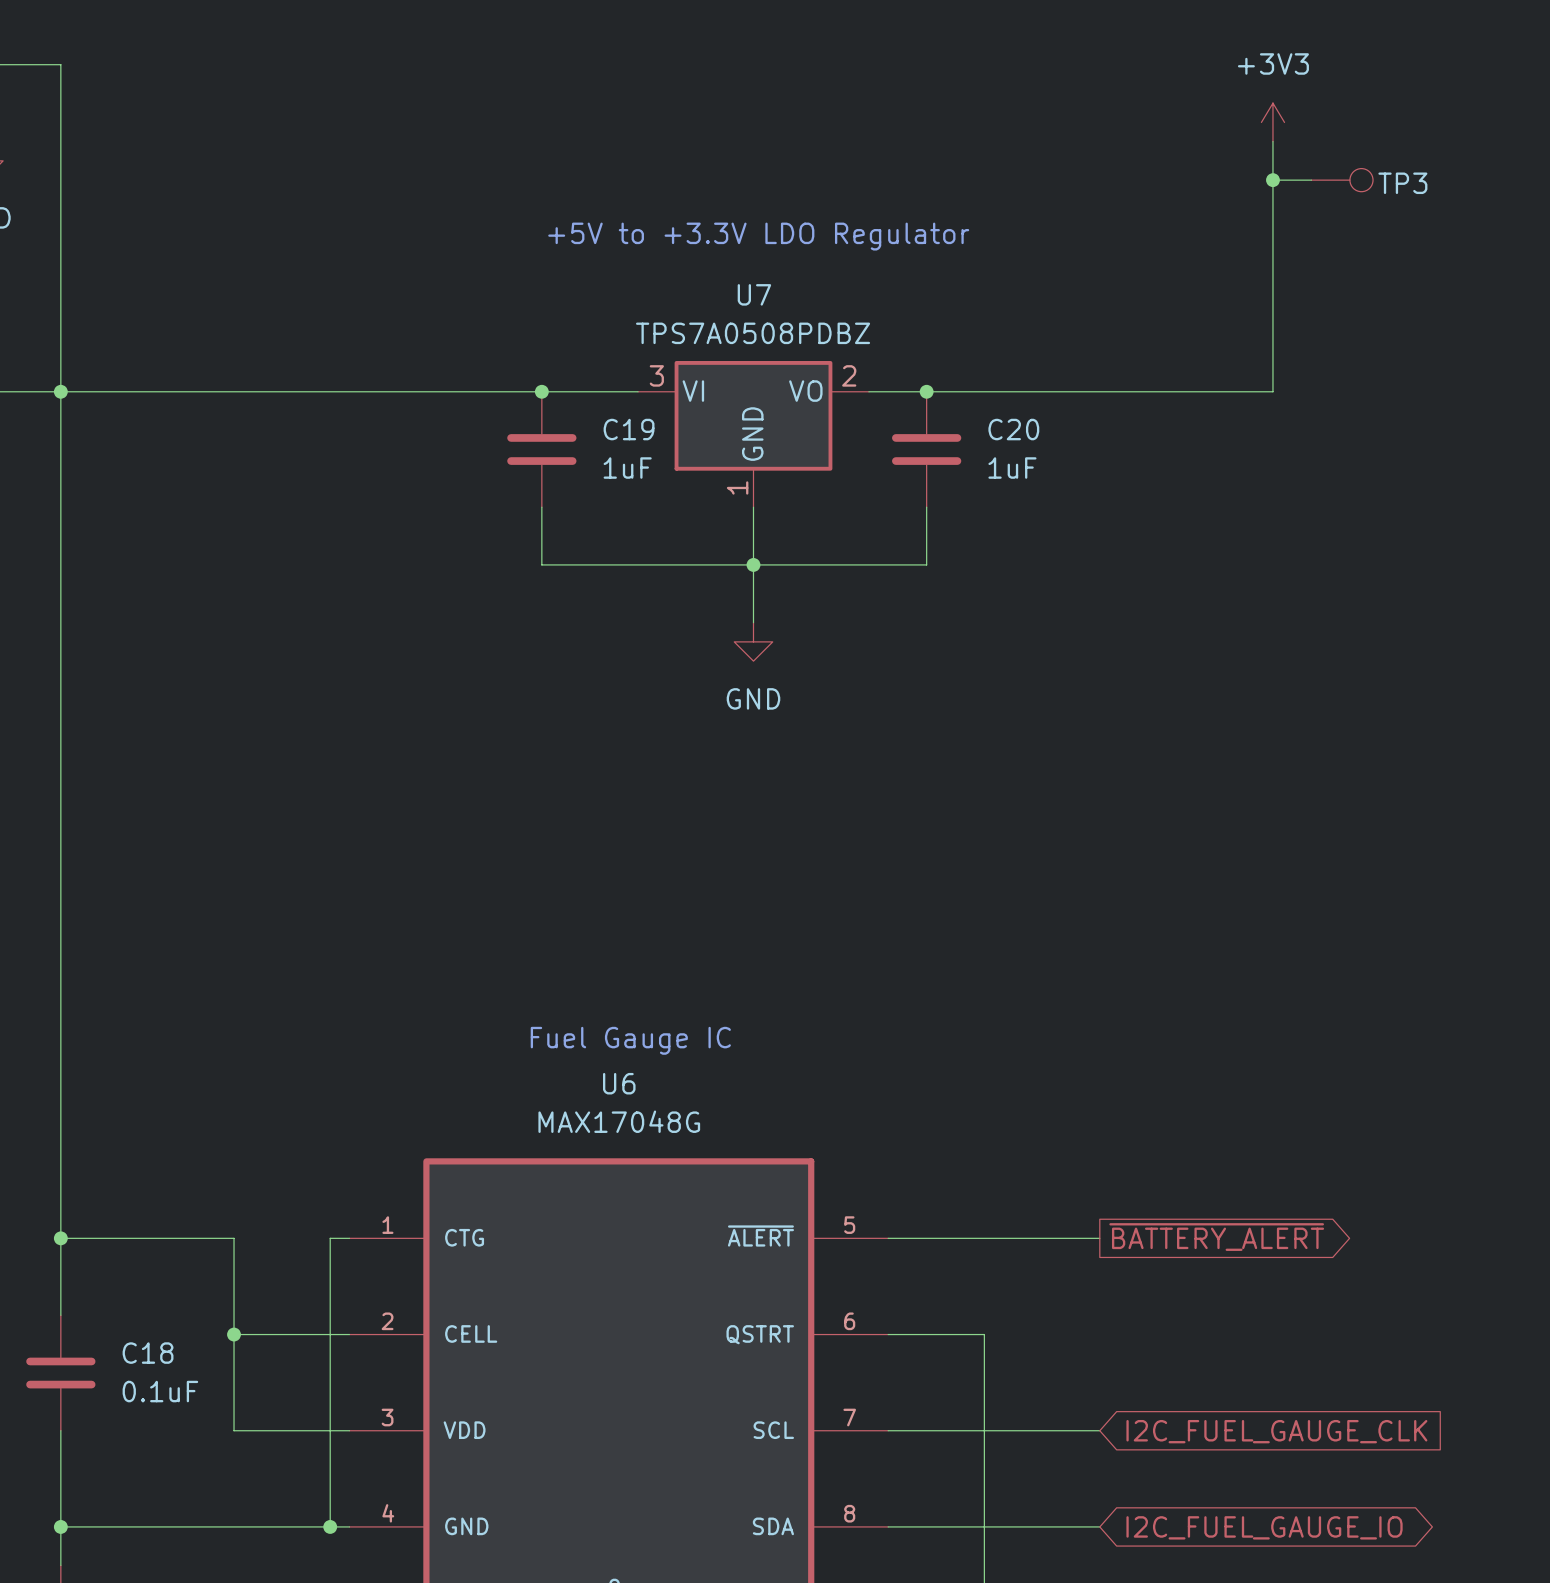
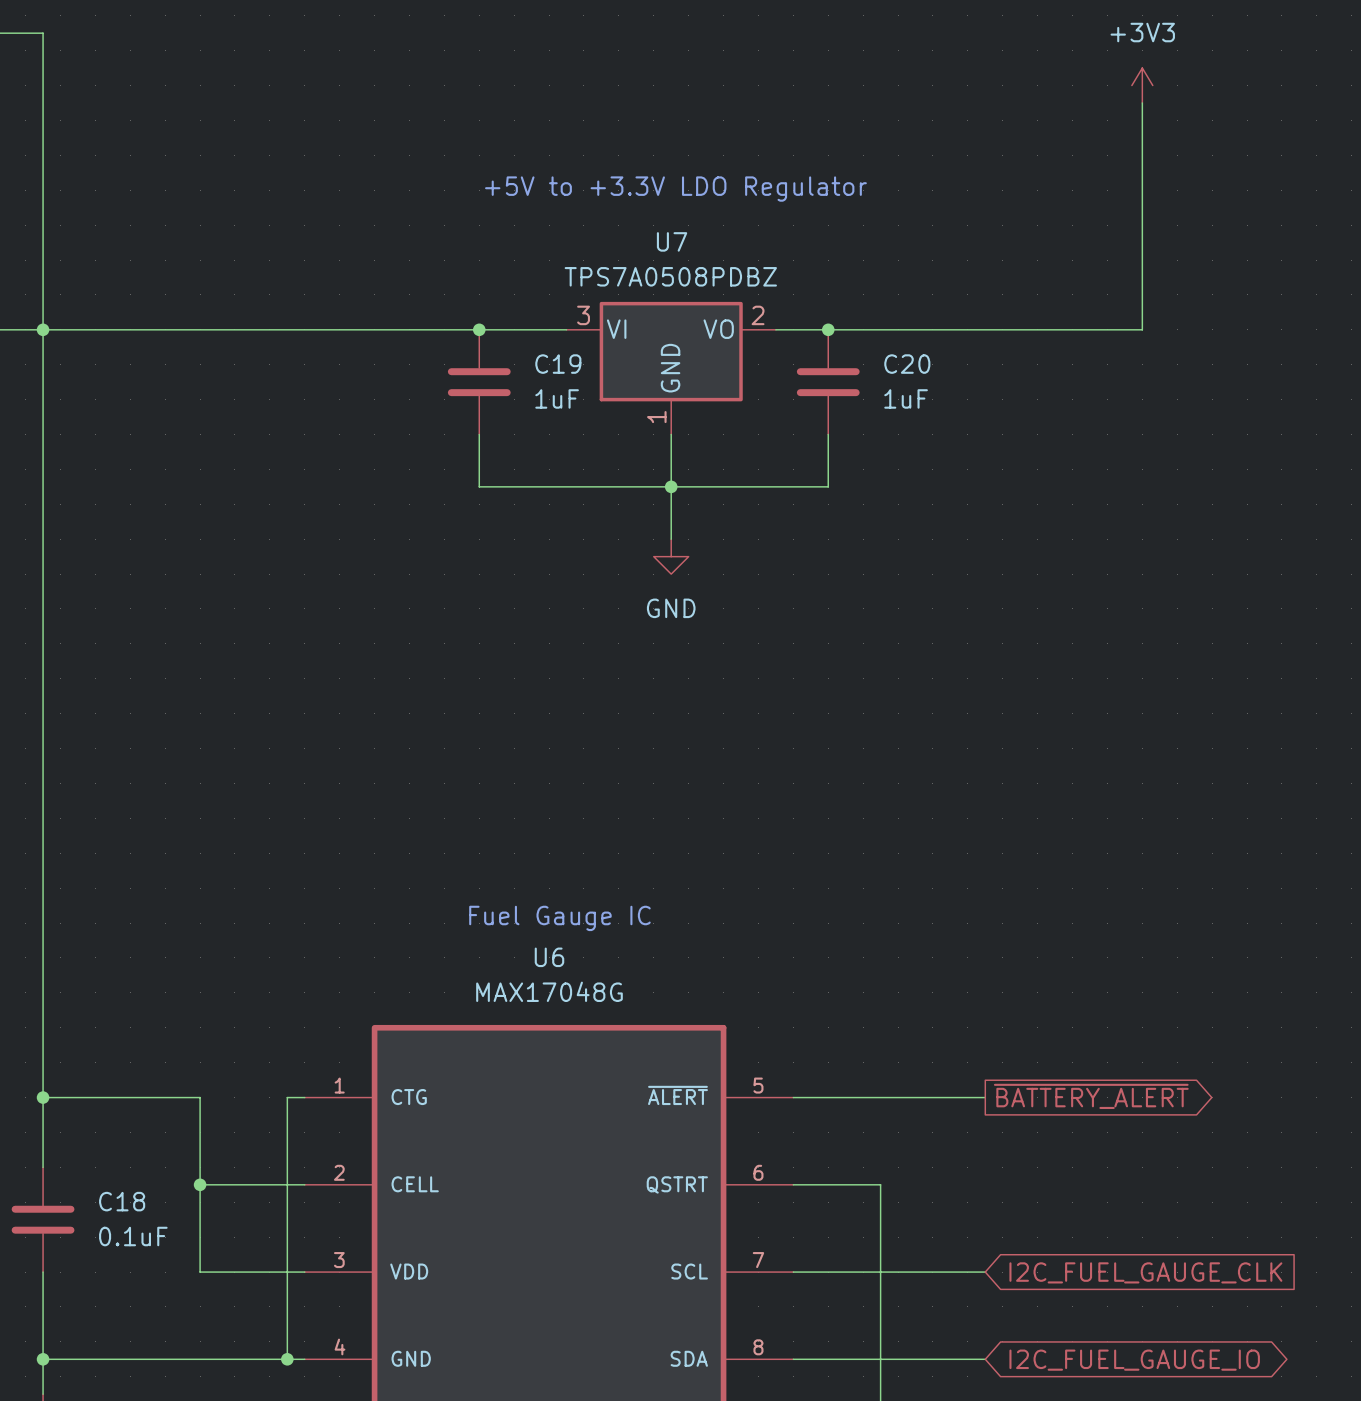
wire: (1272, 180) (1311, 180) -> none
junction: (1272, 180) -> none
TP3: (1342, 180) -> none

